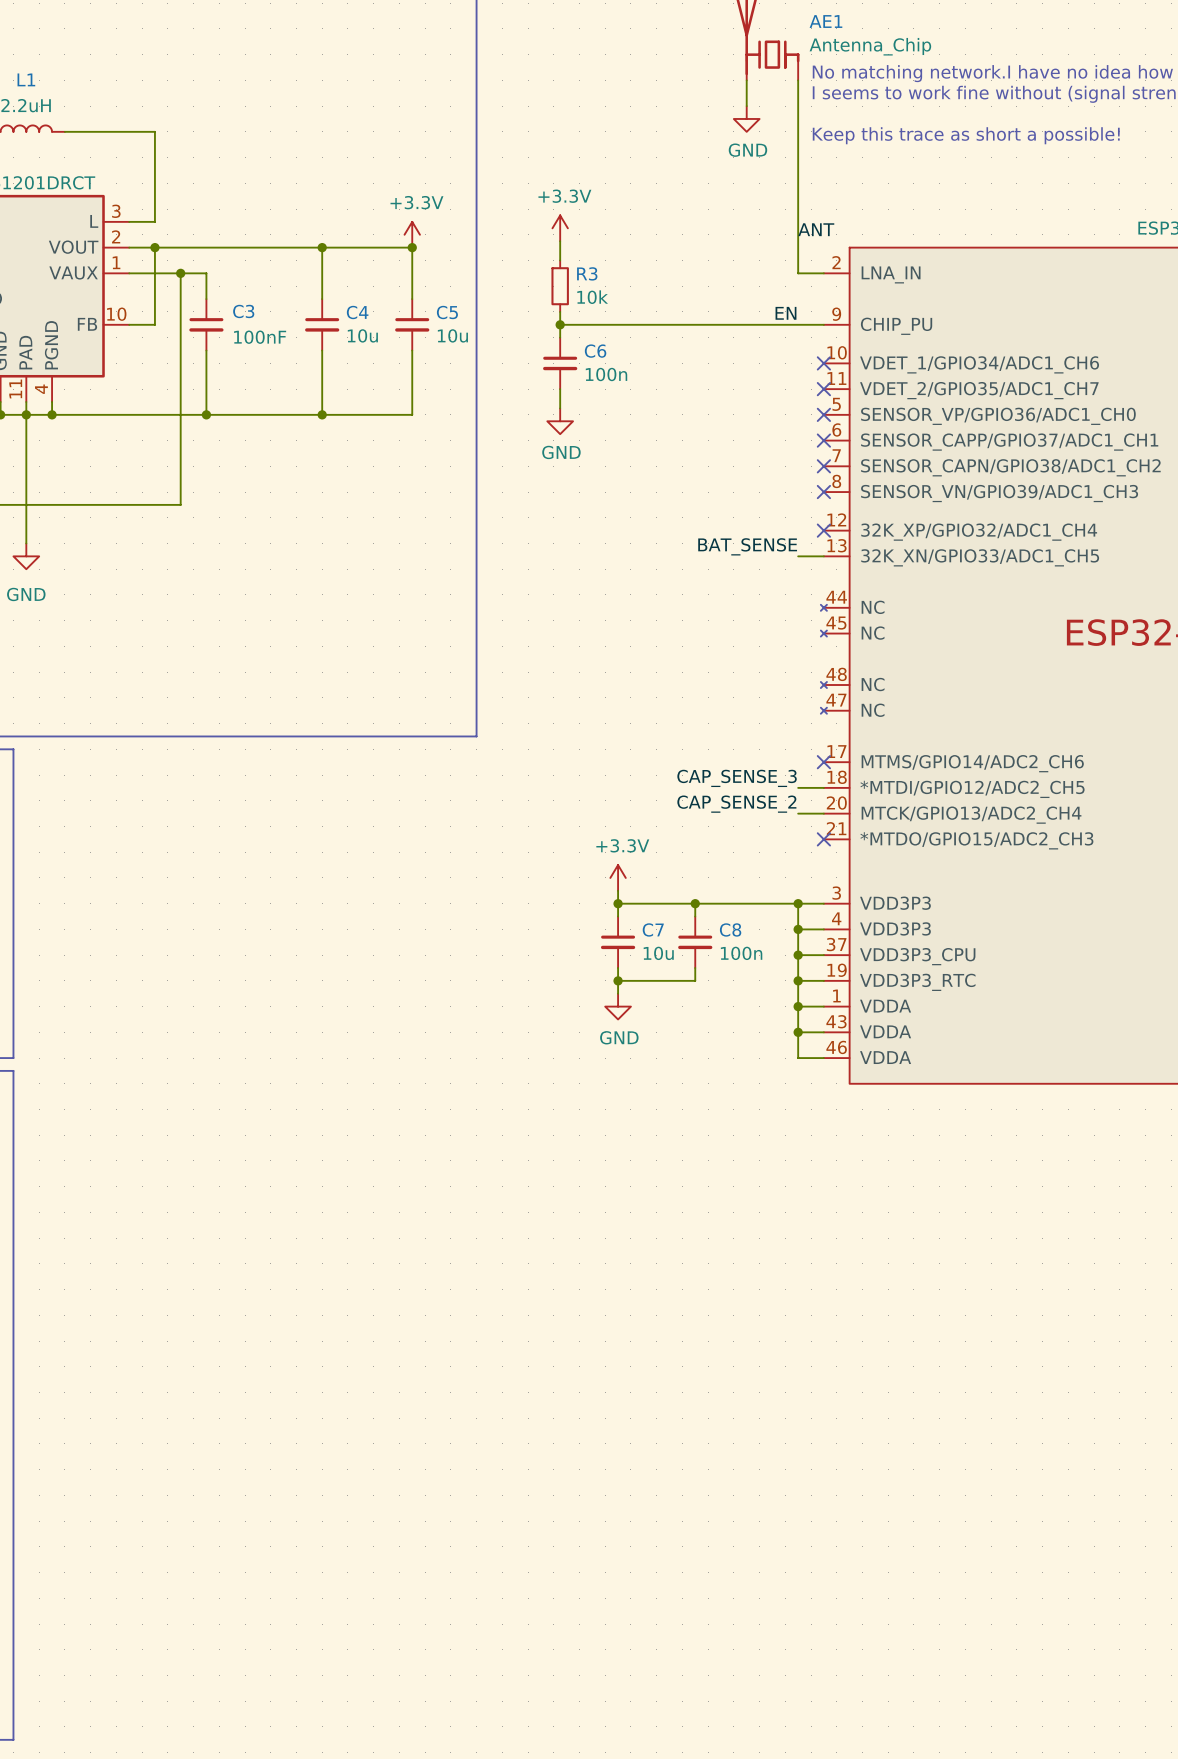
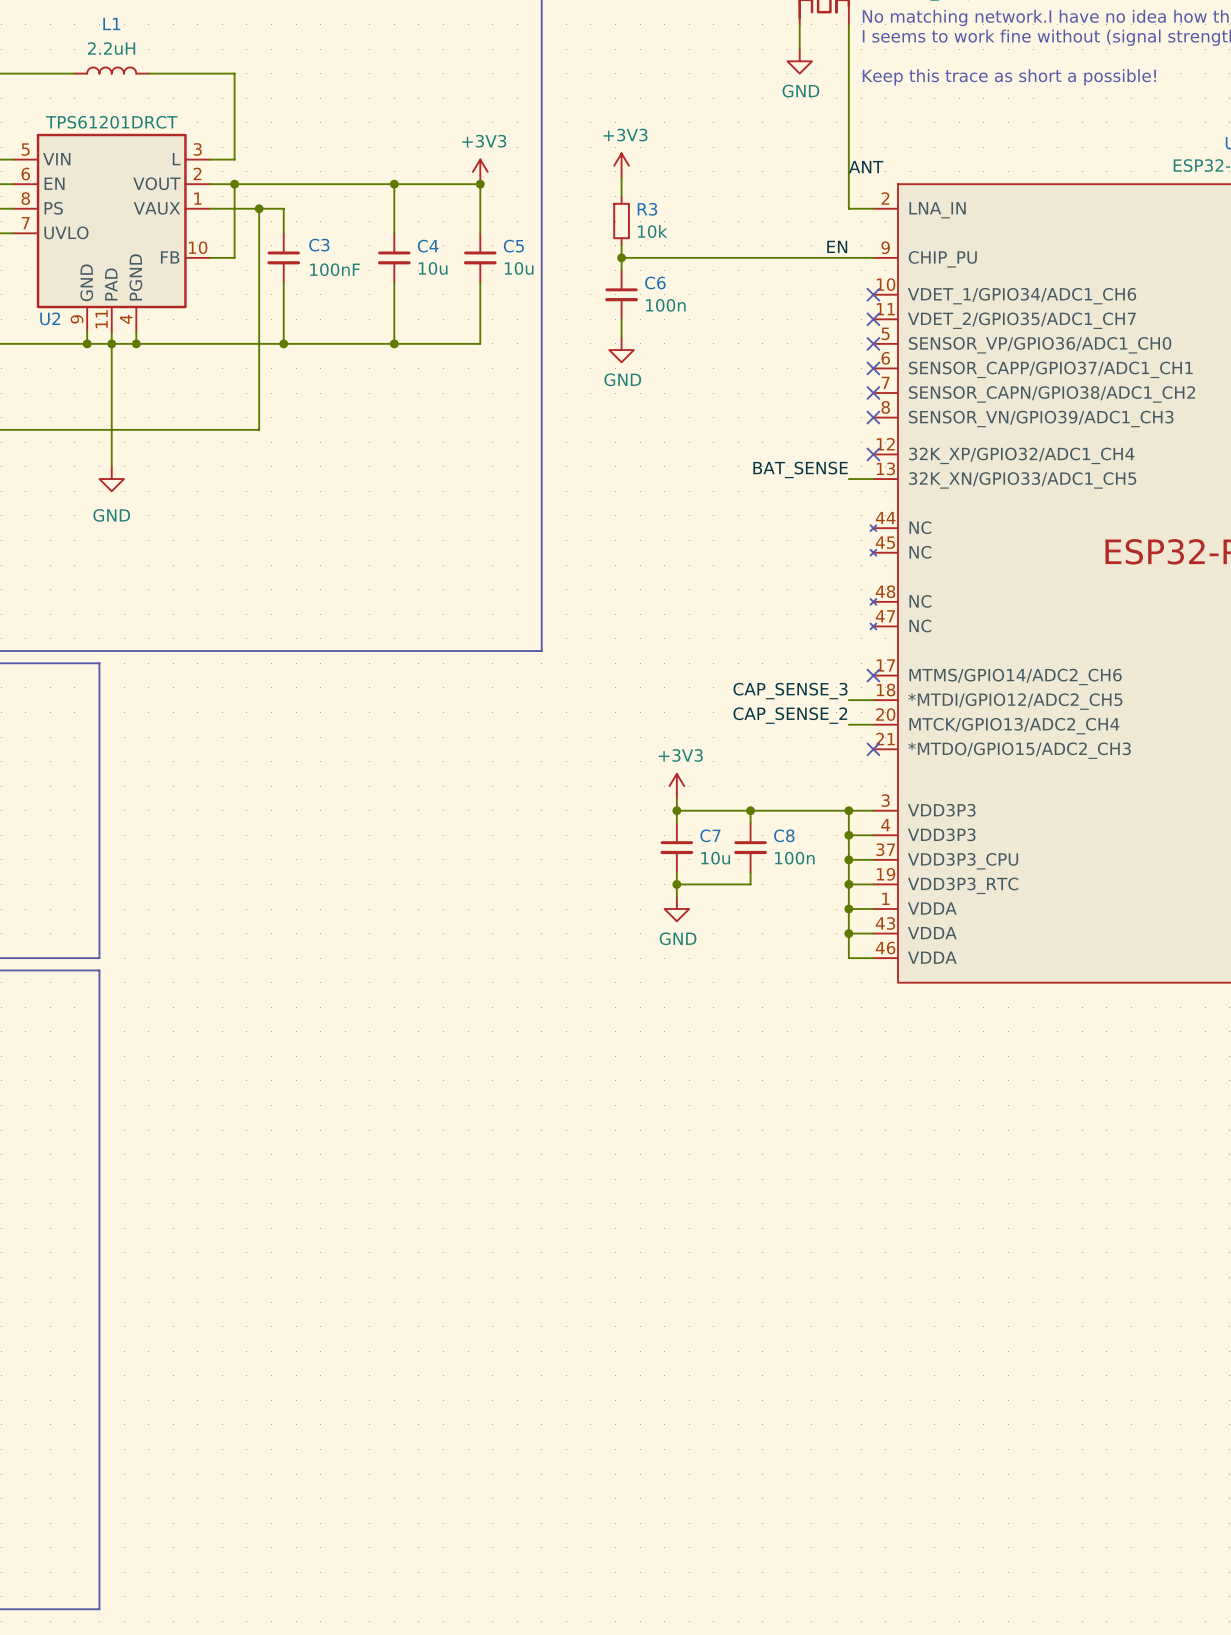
power symbol: +3.3V (560, 228) -> +3V3 (621, 165)
power symbol: +3.3V (412, 234) -> +3V3 (480, 171)
power symbol: +3.3V (618, 877) -> +3V3 (676, 786)

